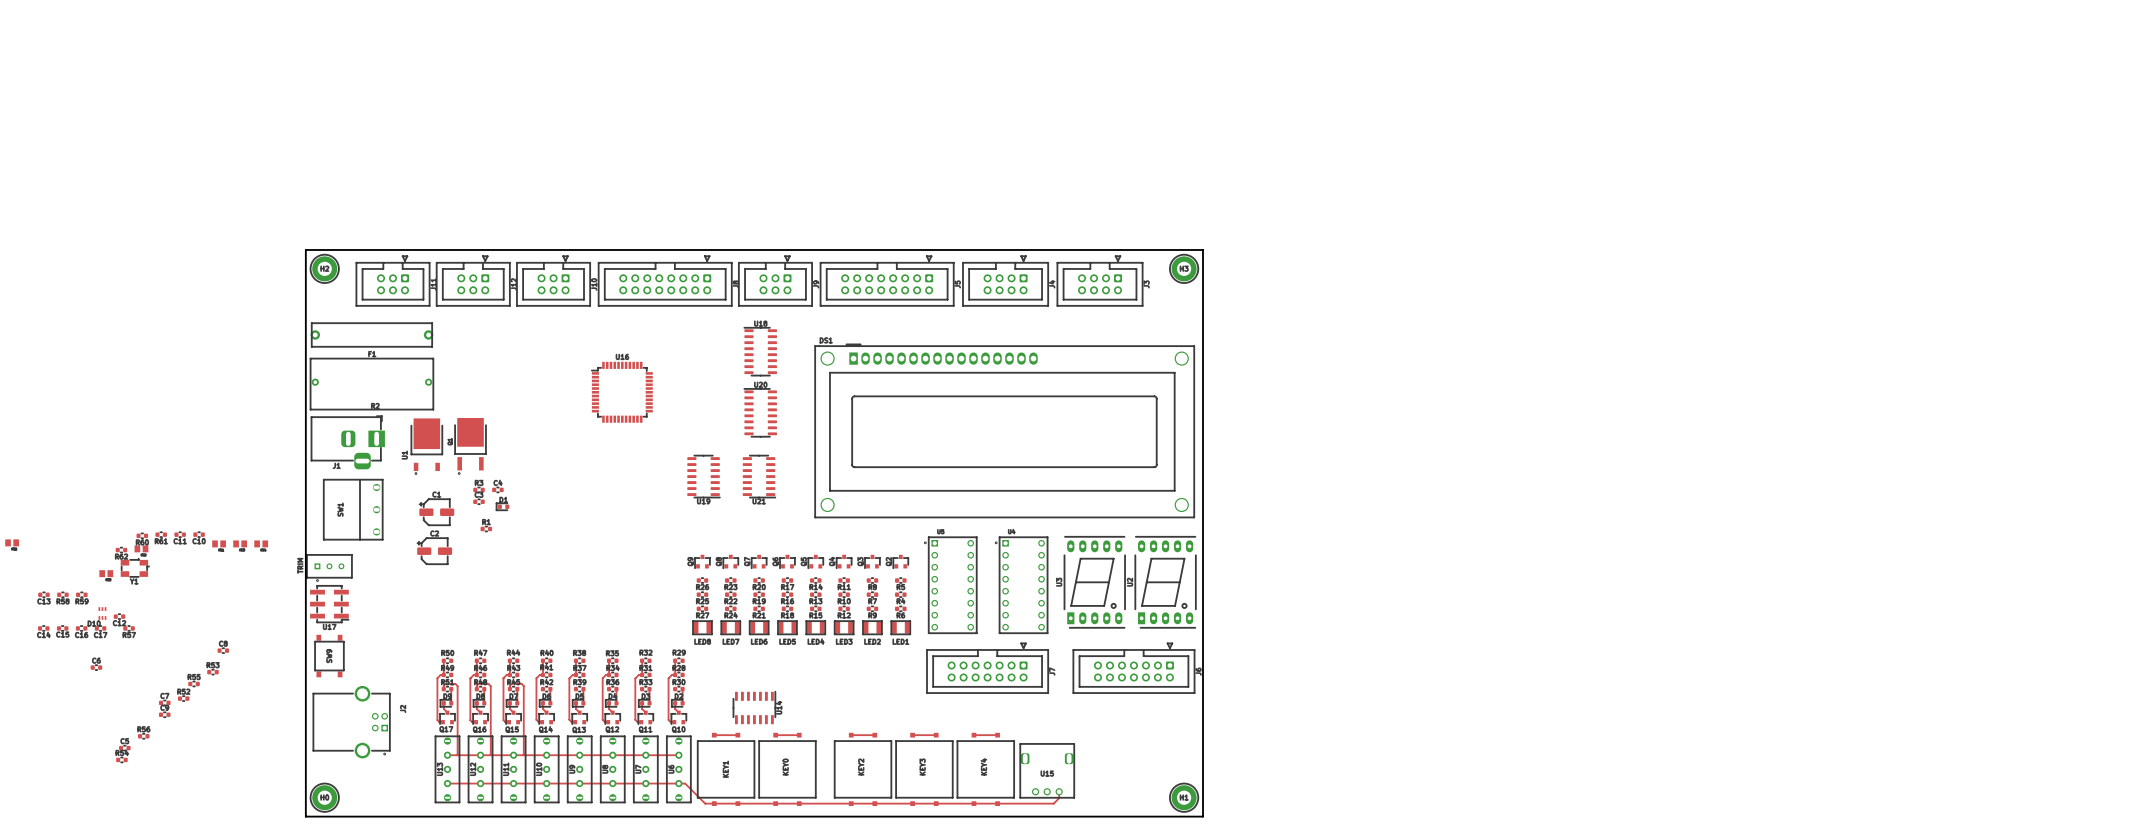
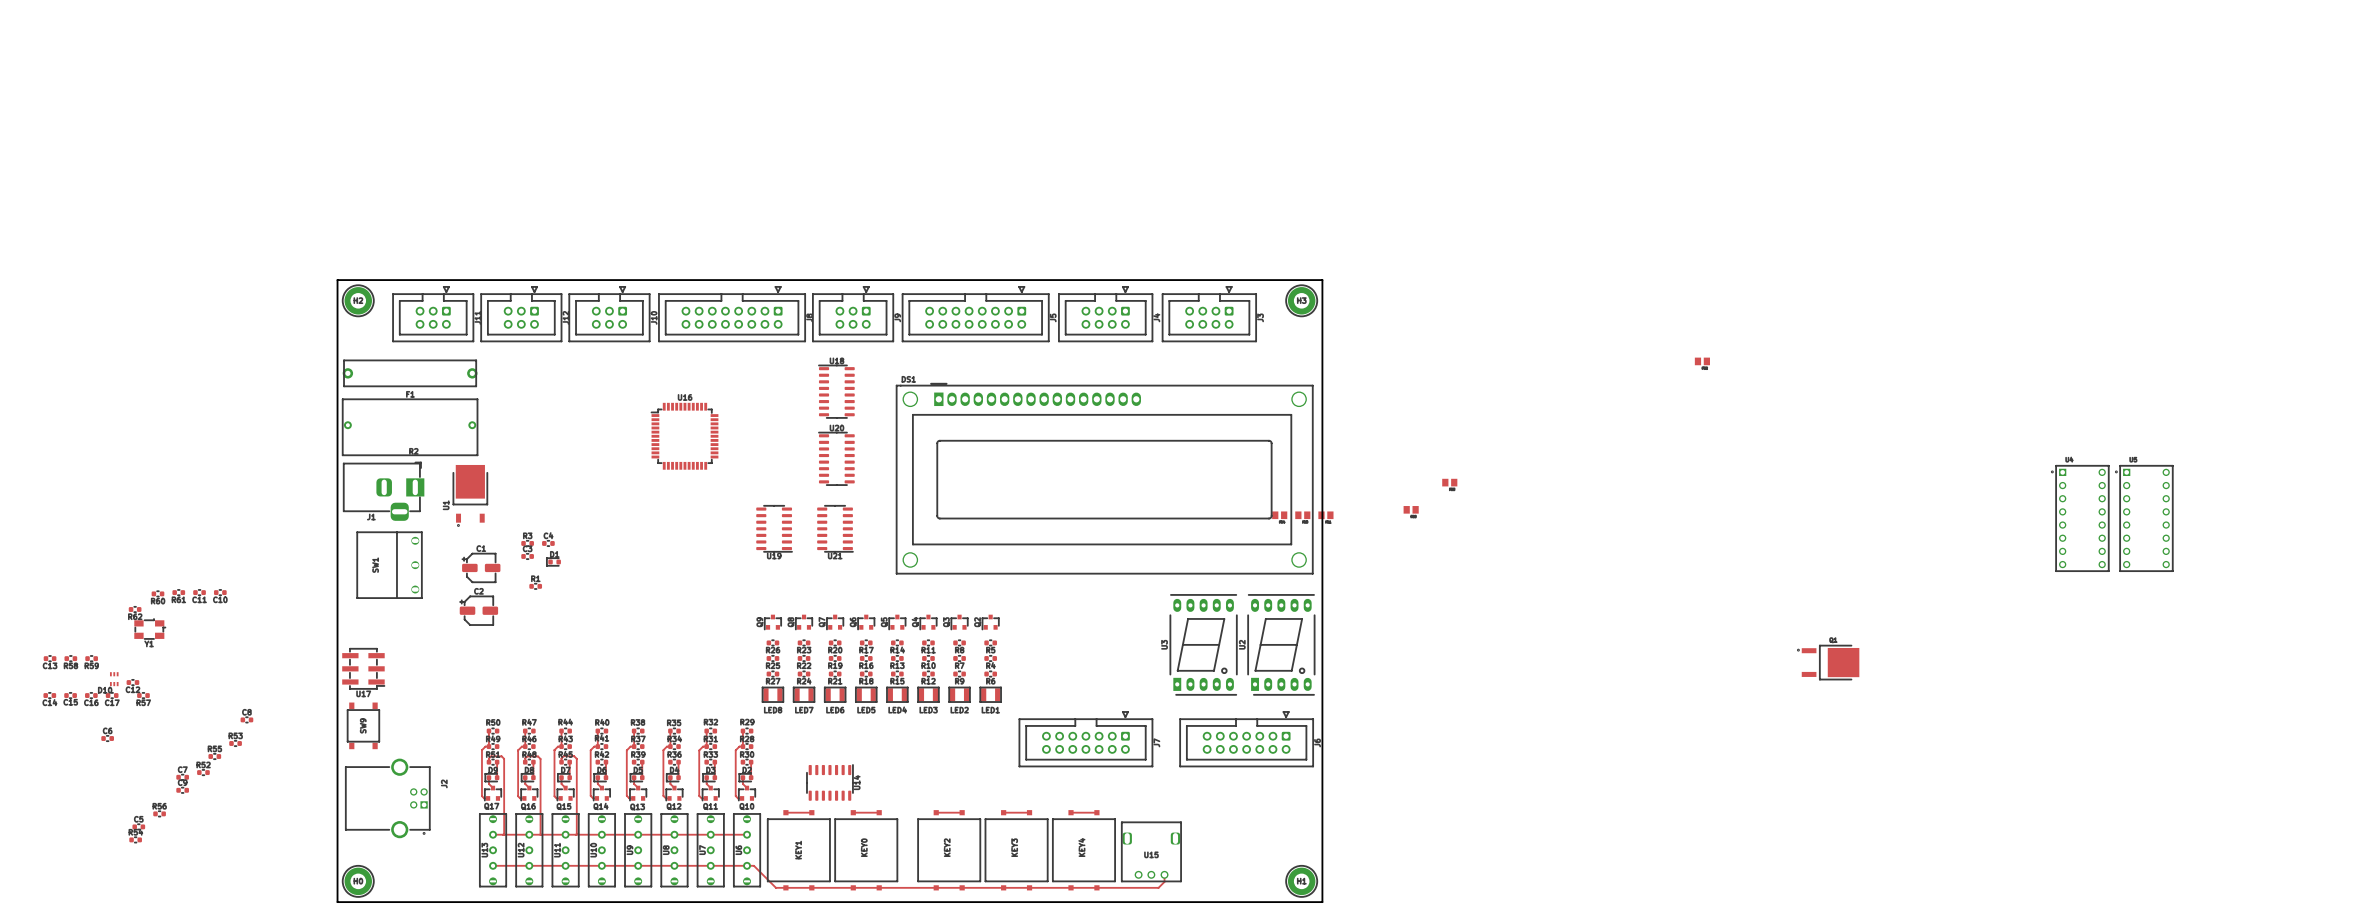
part rotation: 0° (470, 446) -> 90° clockwise (1828, 662)
part position: (470, 446) -> (1828, 662)
part position: (12, 542) -> (1702, 361)
part position: (219, 543) -> (1325, 515)
part position: (240, 543) -> (1302, 515)
part position: (261, 543) -> (1279, 515)
part position: (141, 548) -> (1411, 509)
part: (329, 568) -> none
part position: (106, 573) -> (1449, 482)
part position: (950, 585) -> (2144, 518)
part position: (1021, 585) -> (2080, 518)

